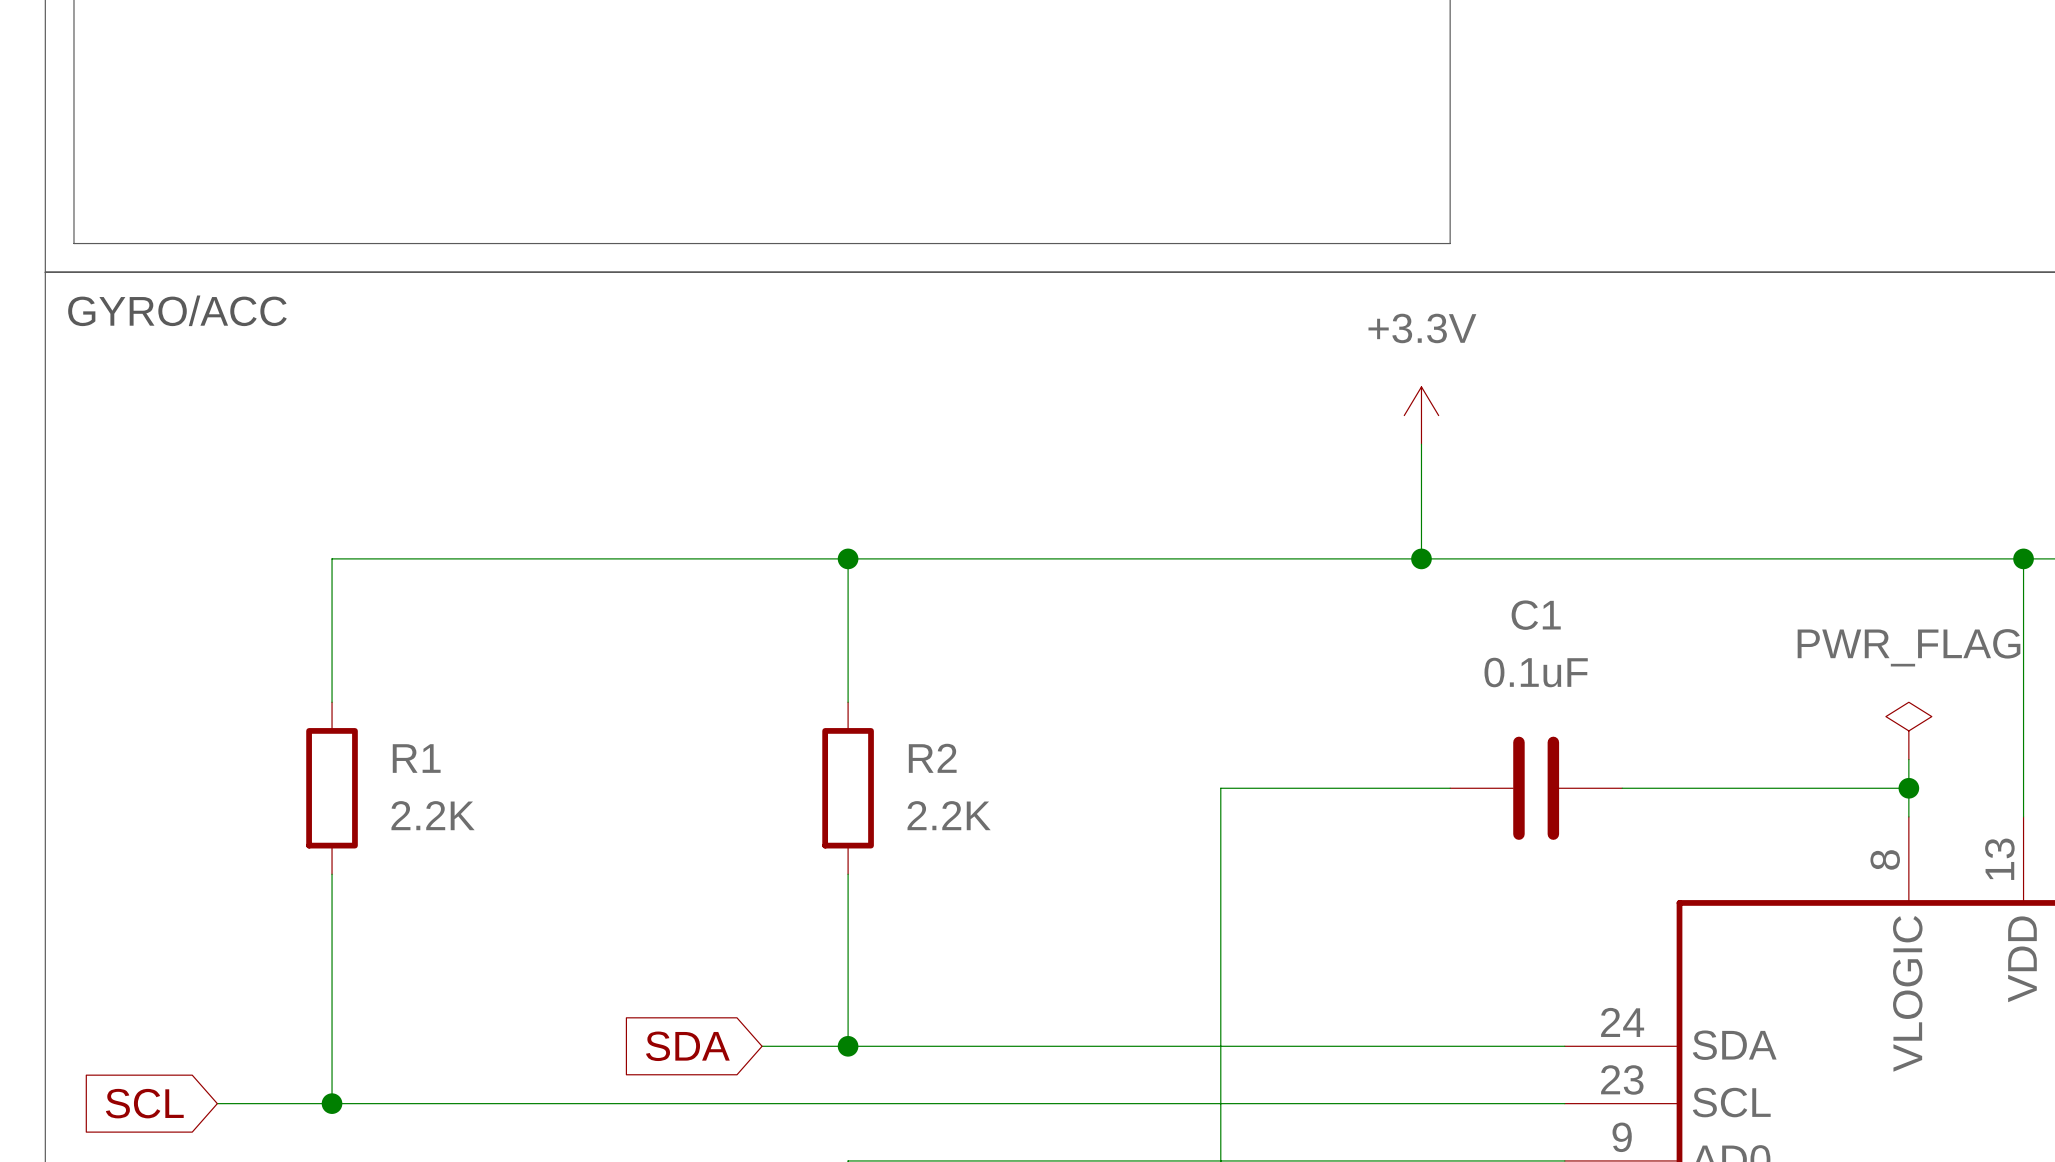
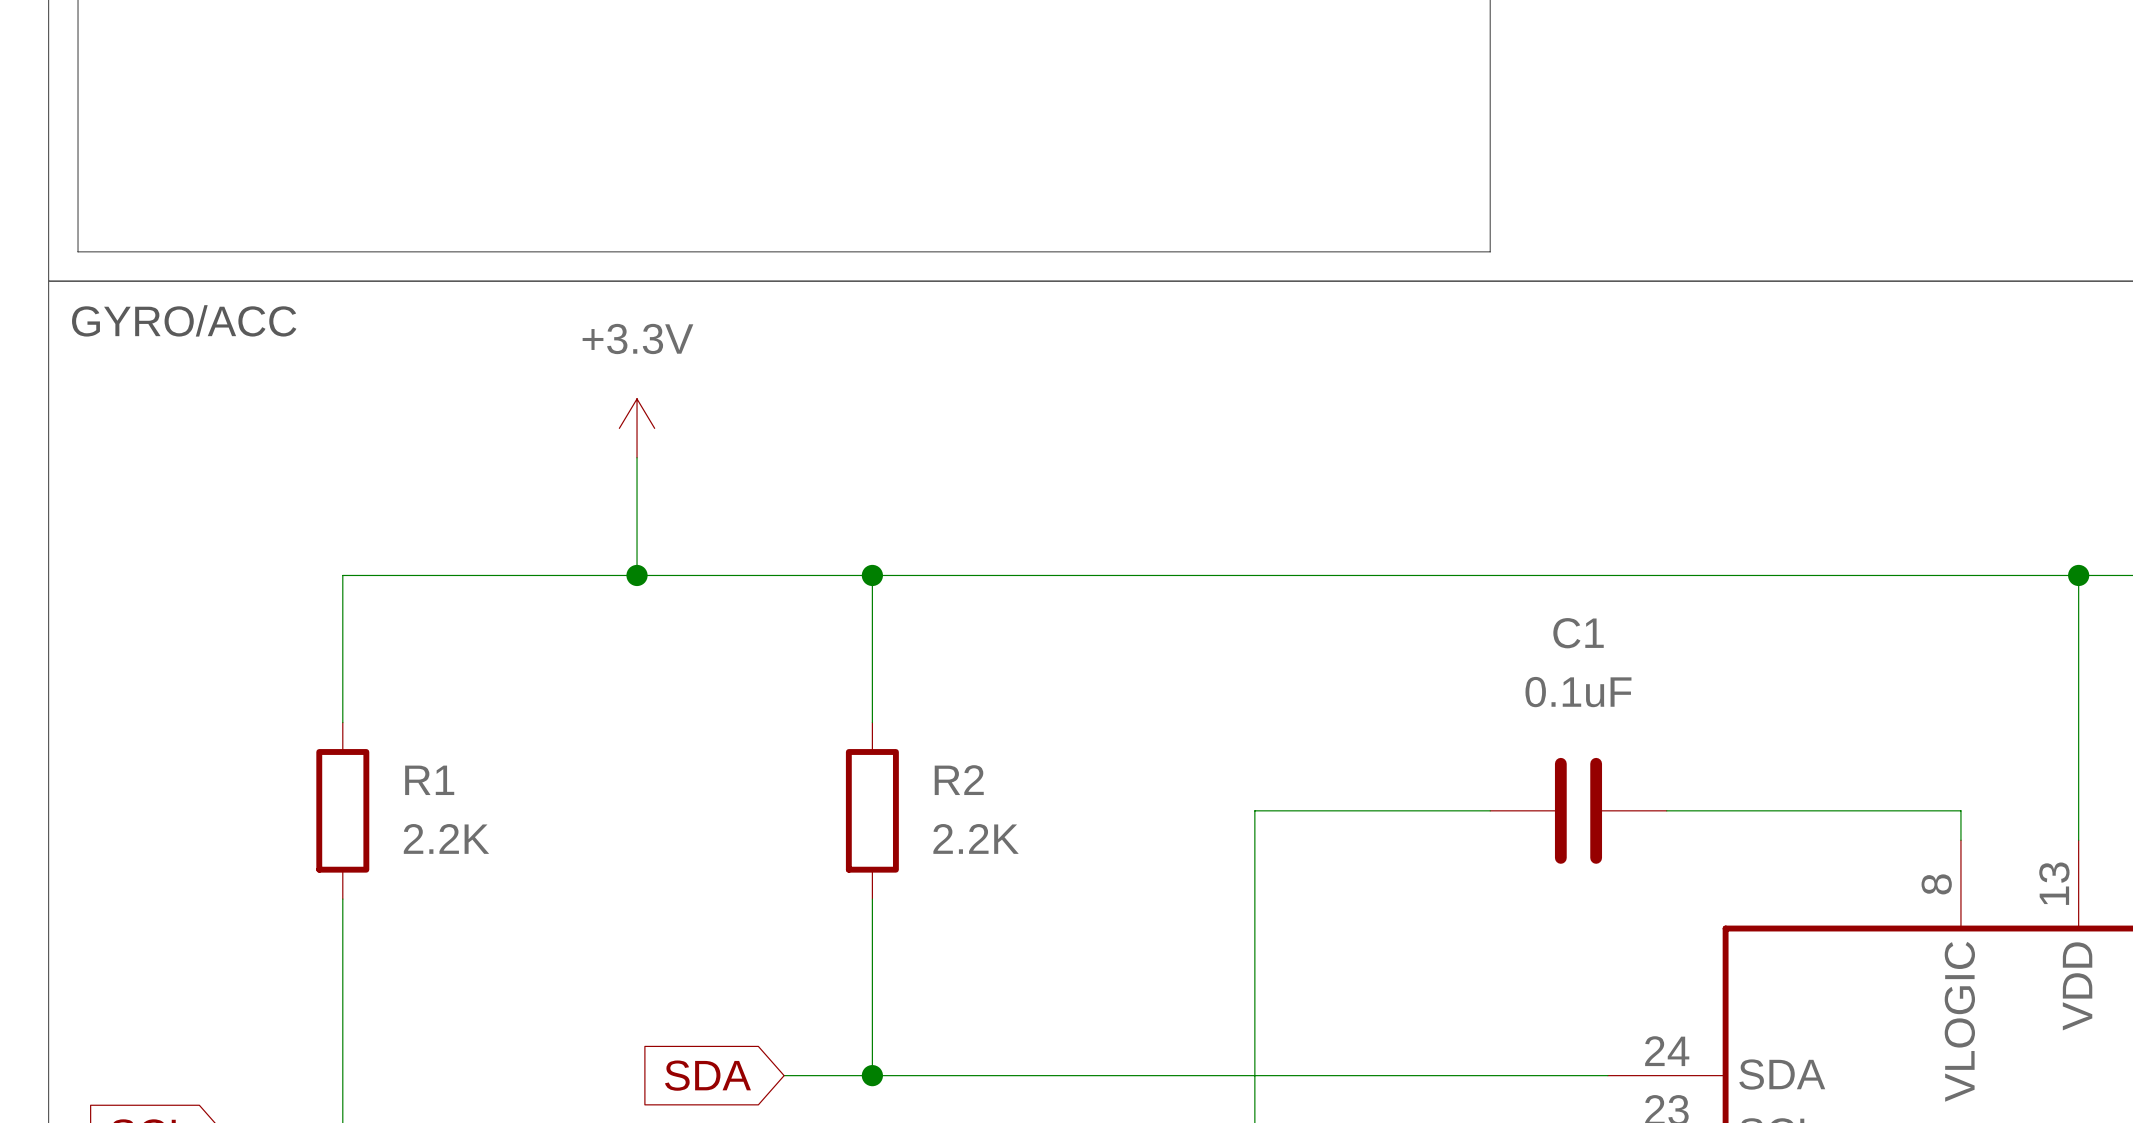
power symbol: none -> +3.3V (637, 428)
power symbol: +3.3V (1421, 415) -> none
wire: none -> (637, 457) (637, 575)
wire: (1421, 444) (1421, 558) -> none
junction: none -> (637, 575)
junction: (1421, 558) -> none
power symbol: PWR_FLAG (1908, 730) -> none
wire: (1908, 759) (1908, 788) -> none
junction: (1908, 788) -> none

